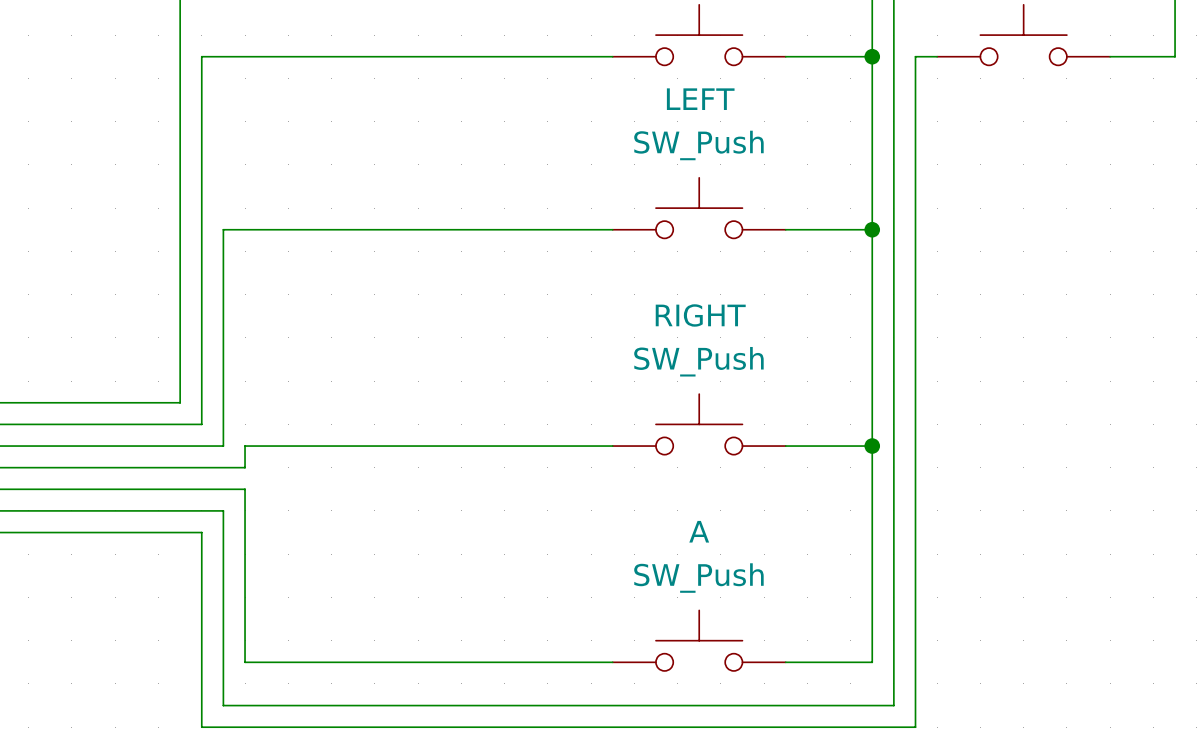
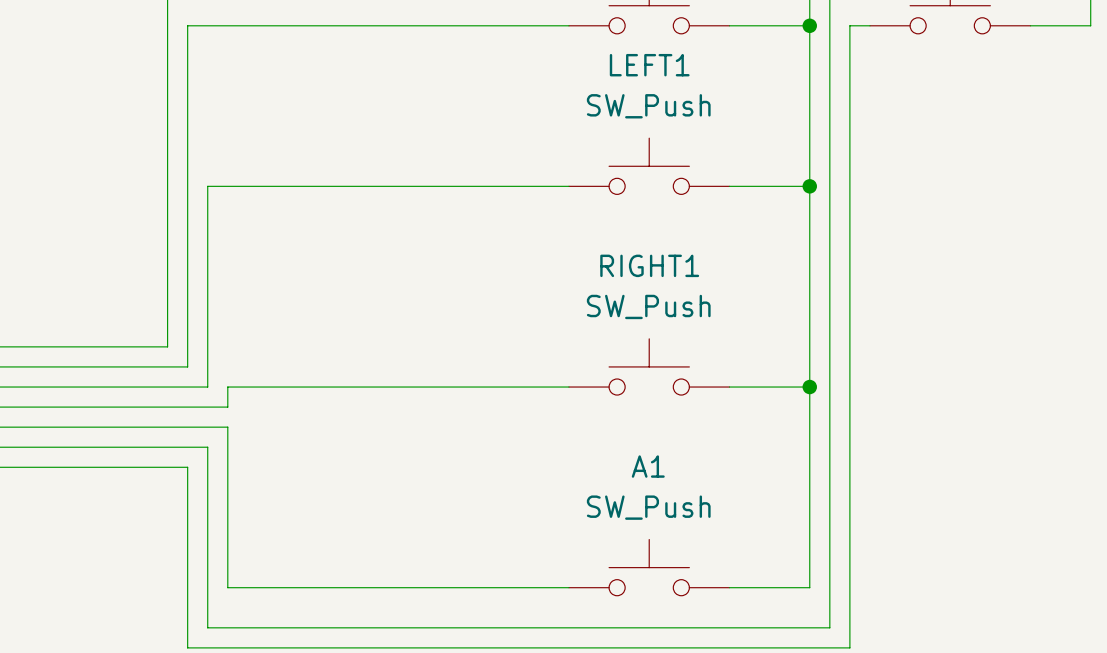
LEFT name: LEFT (700, 99) -> LEFT1 (649, 65)
RIGHT name: RIGHT (700, 315) -> RIGHT1 (649, 265)
A name: A (699, 531) -> A1 (648, 466)

